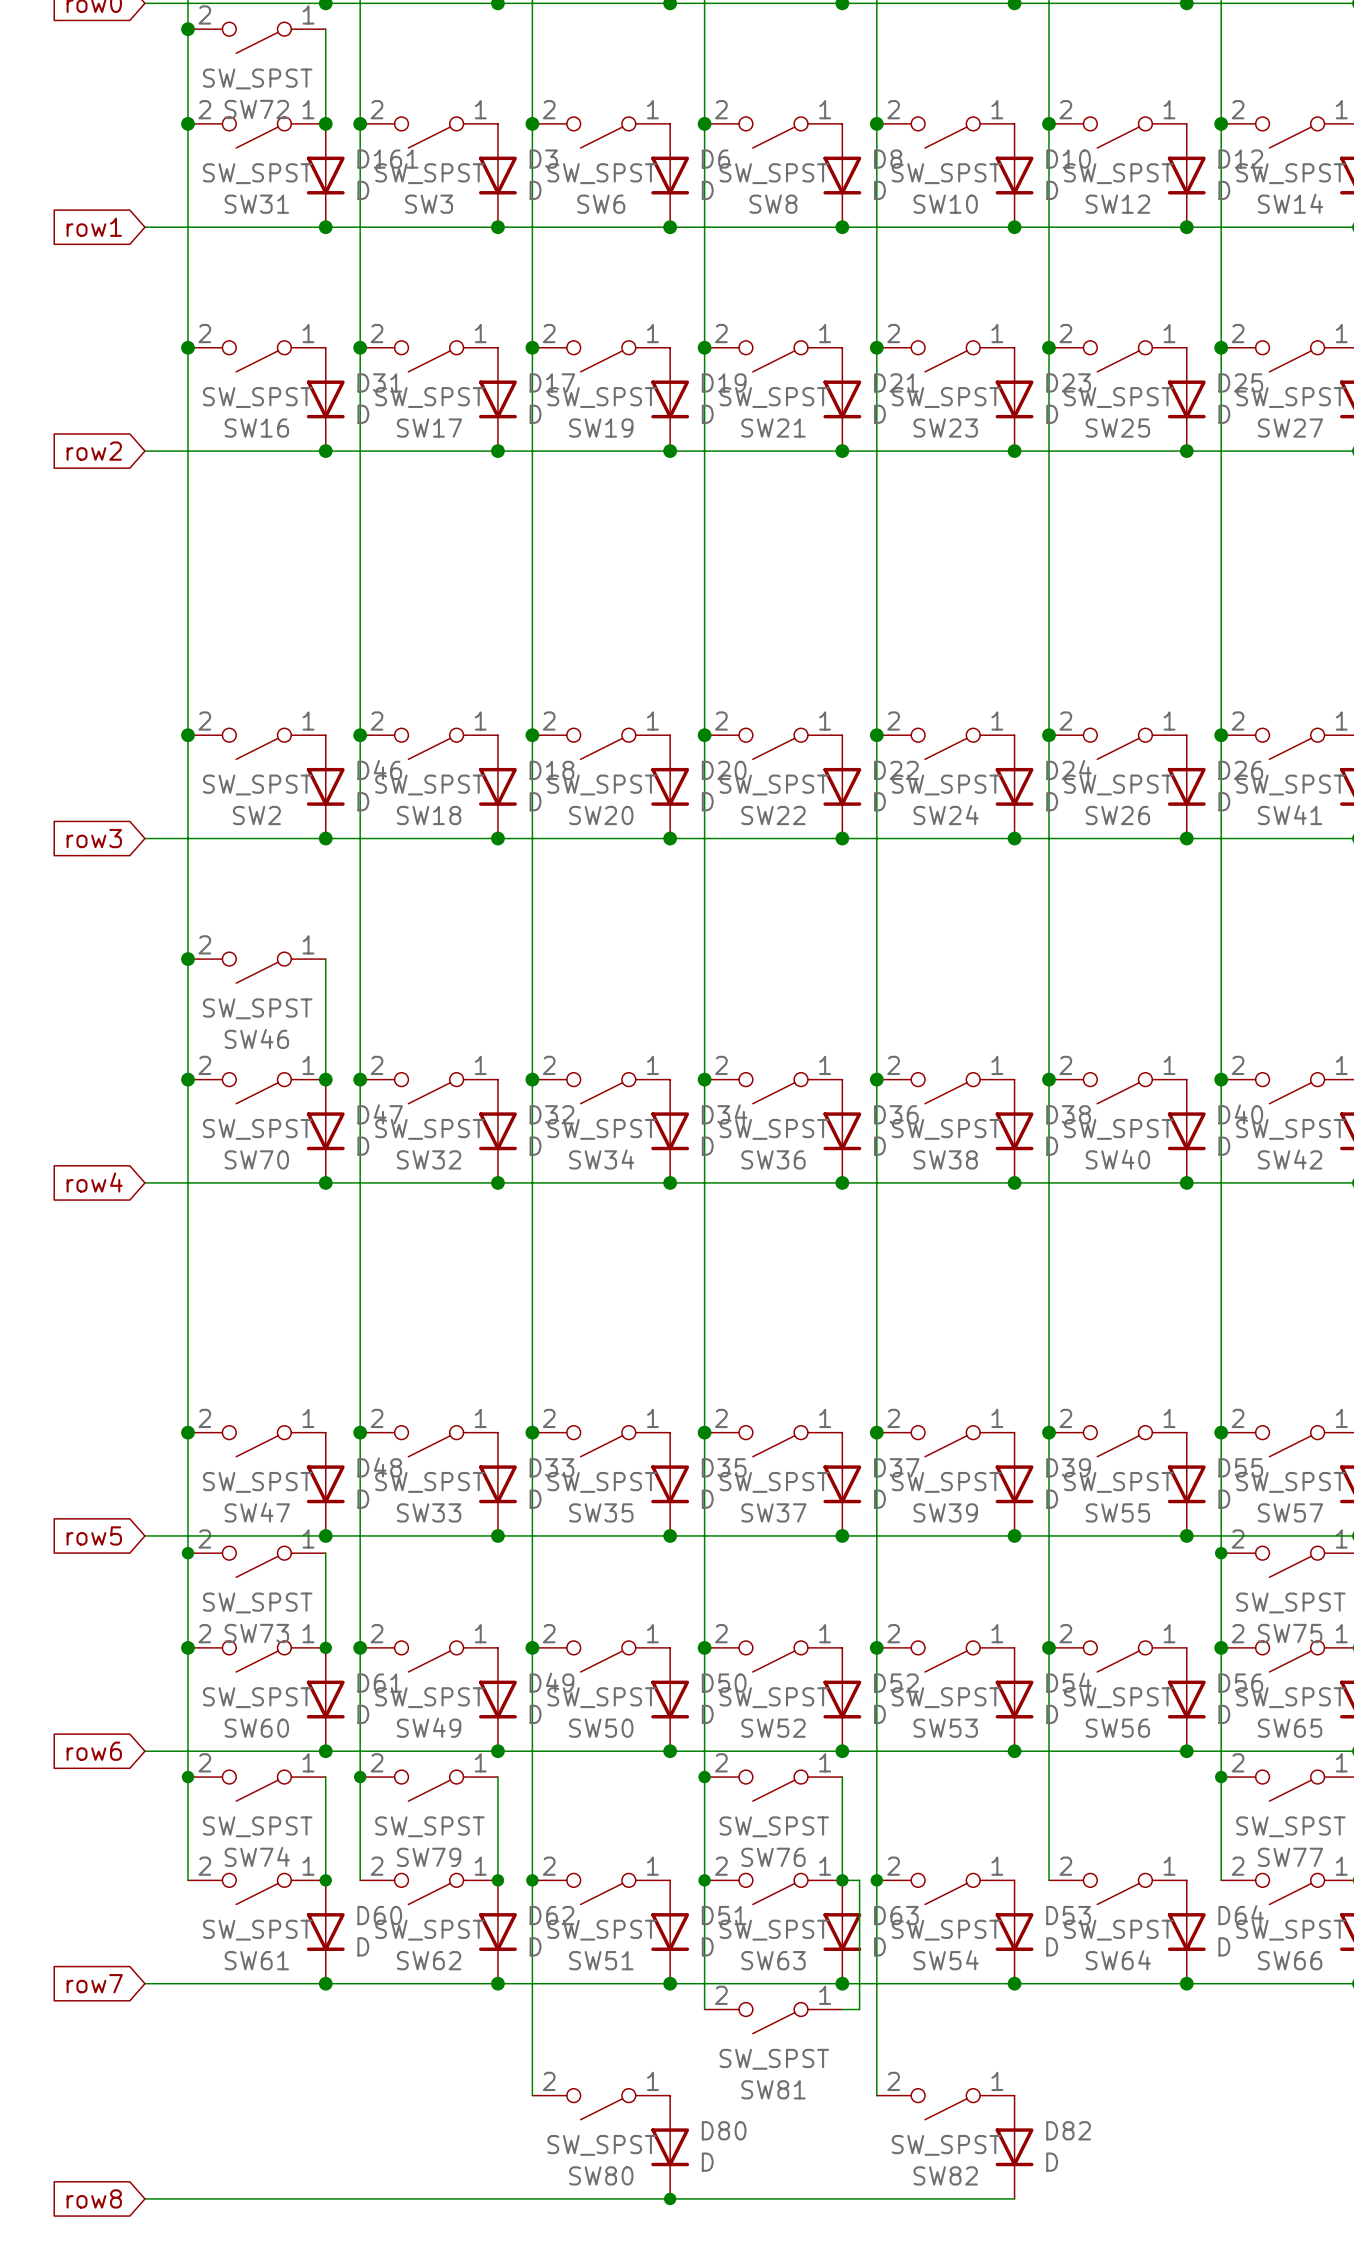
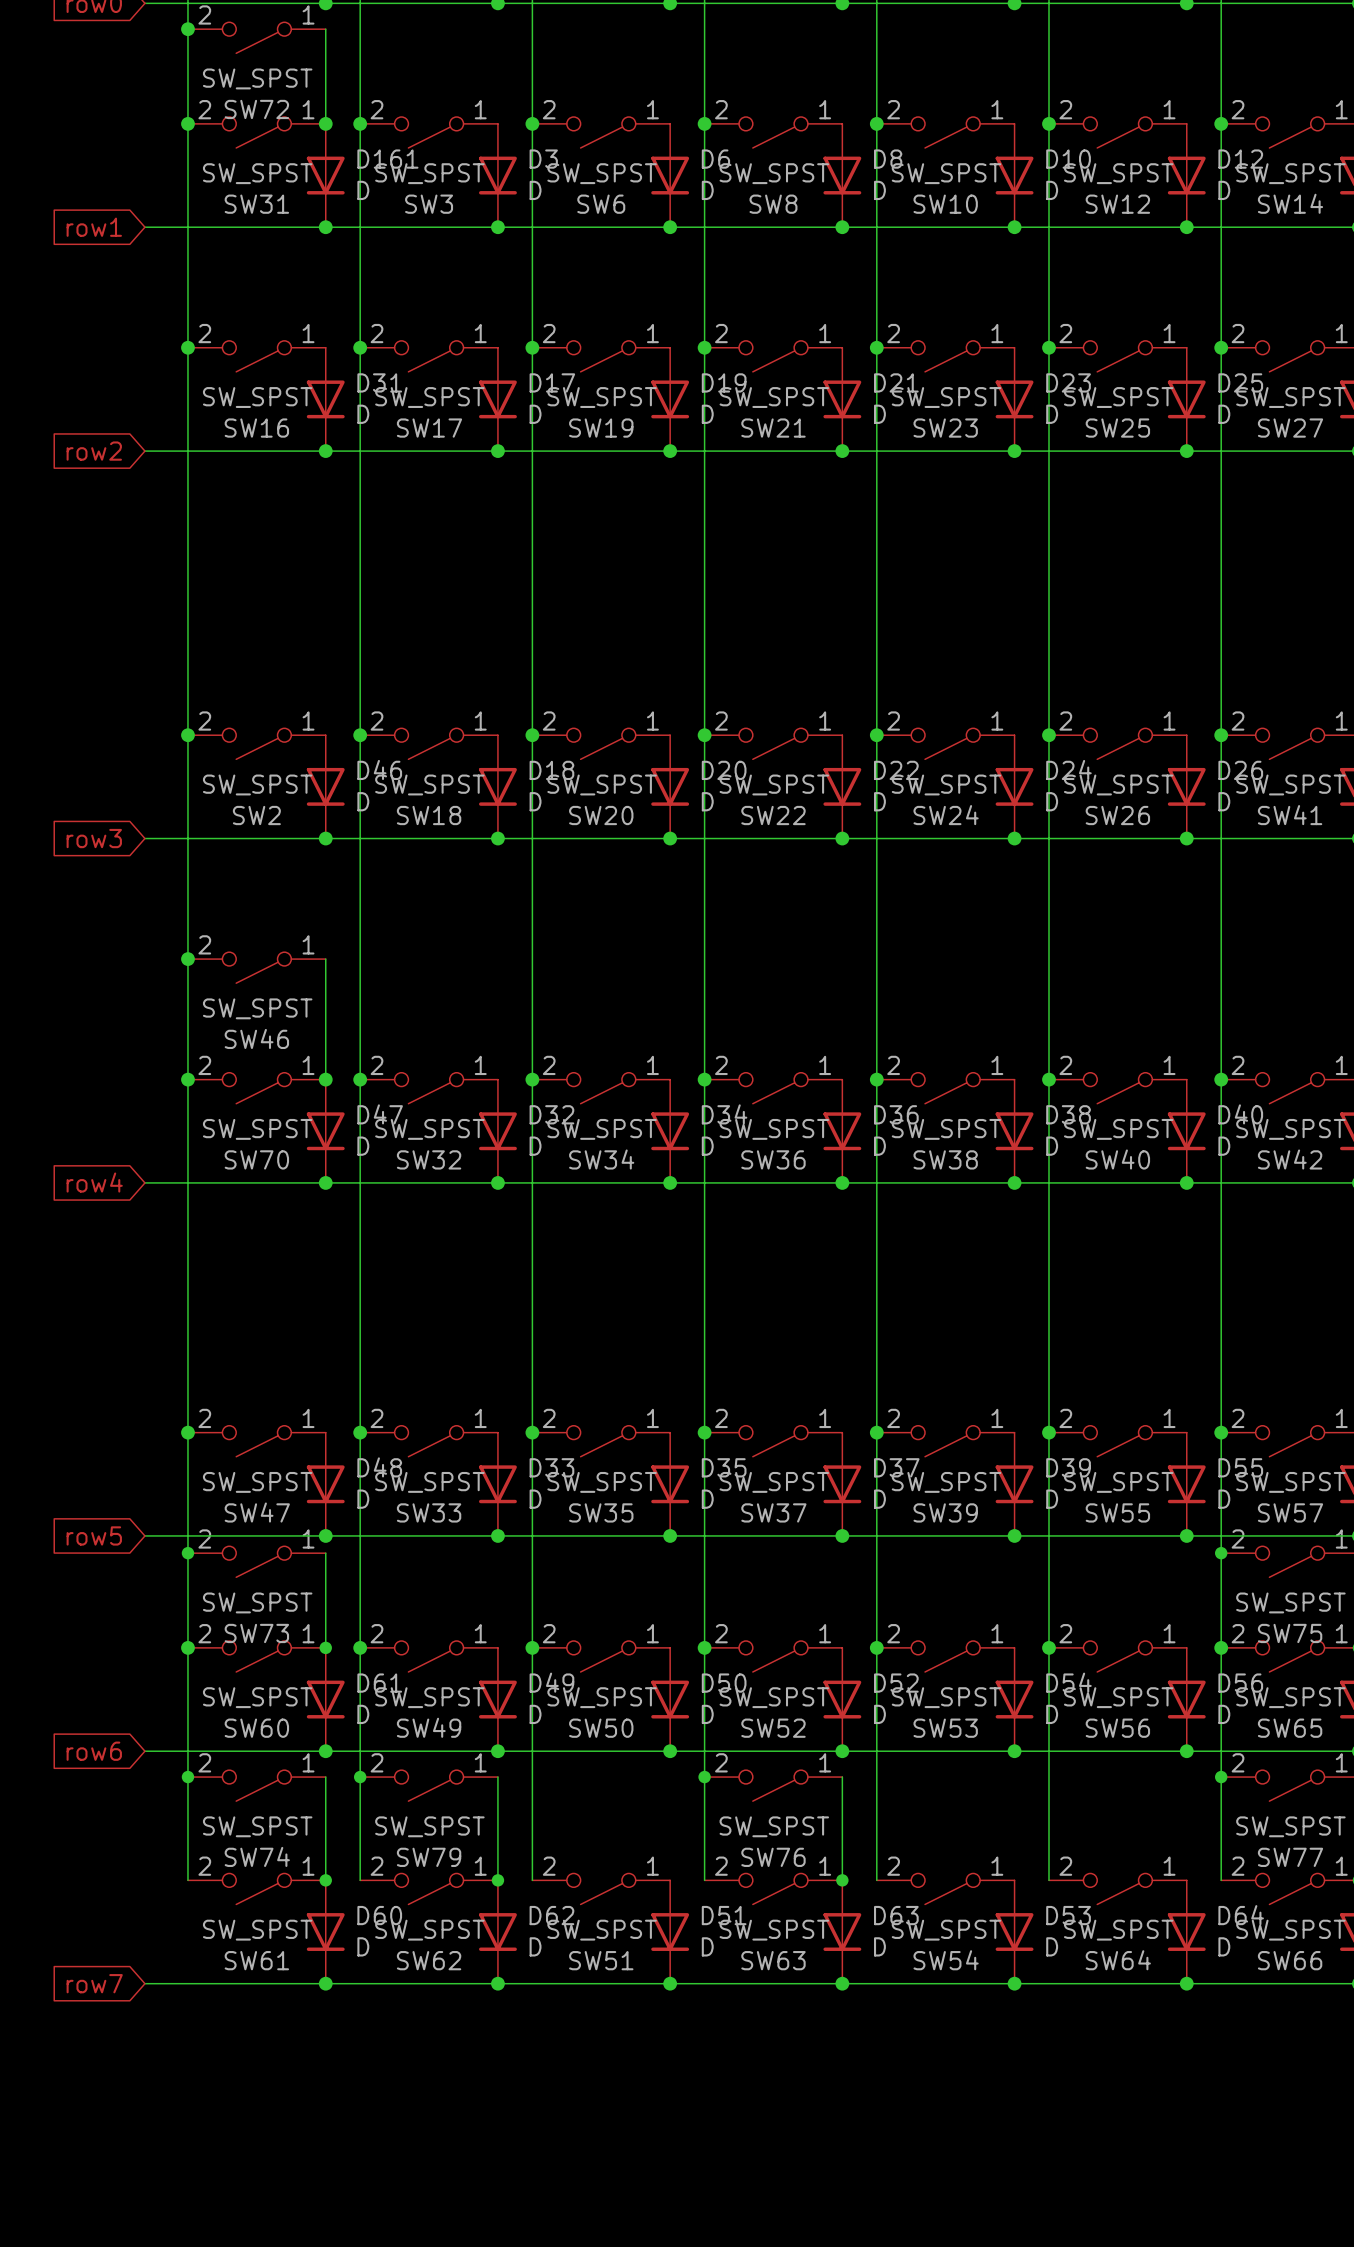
wire: (532, 1880) (532, 2095) -> none
junction: (532, 1880) -> none
wire: (704, 1880) (704, 2009) -> none
junction: (704, 1880) -> none
wire: (842, 1880) (859, 1880) (859, 2009) (842, 2009) -> none
wire: (876, 1880) (876, 2095) -> none
junction: (876, 1880) -> none
SW81: SW_SPST (773, 2018) -> none
SW80: SW_SPST (601, 2104) -> none
SW82: SW_SPST (945, 2104) -> none
D80: D (670, 2147) -> none
D82: D (1014, 2147) -> none
global label: row8 (94, 2198) -> none
wire: (144, 2198) (1014, 2198) -> none
junction: (670, 2198) -> none

